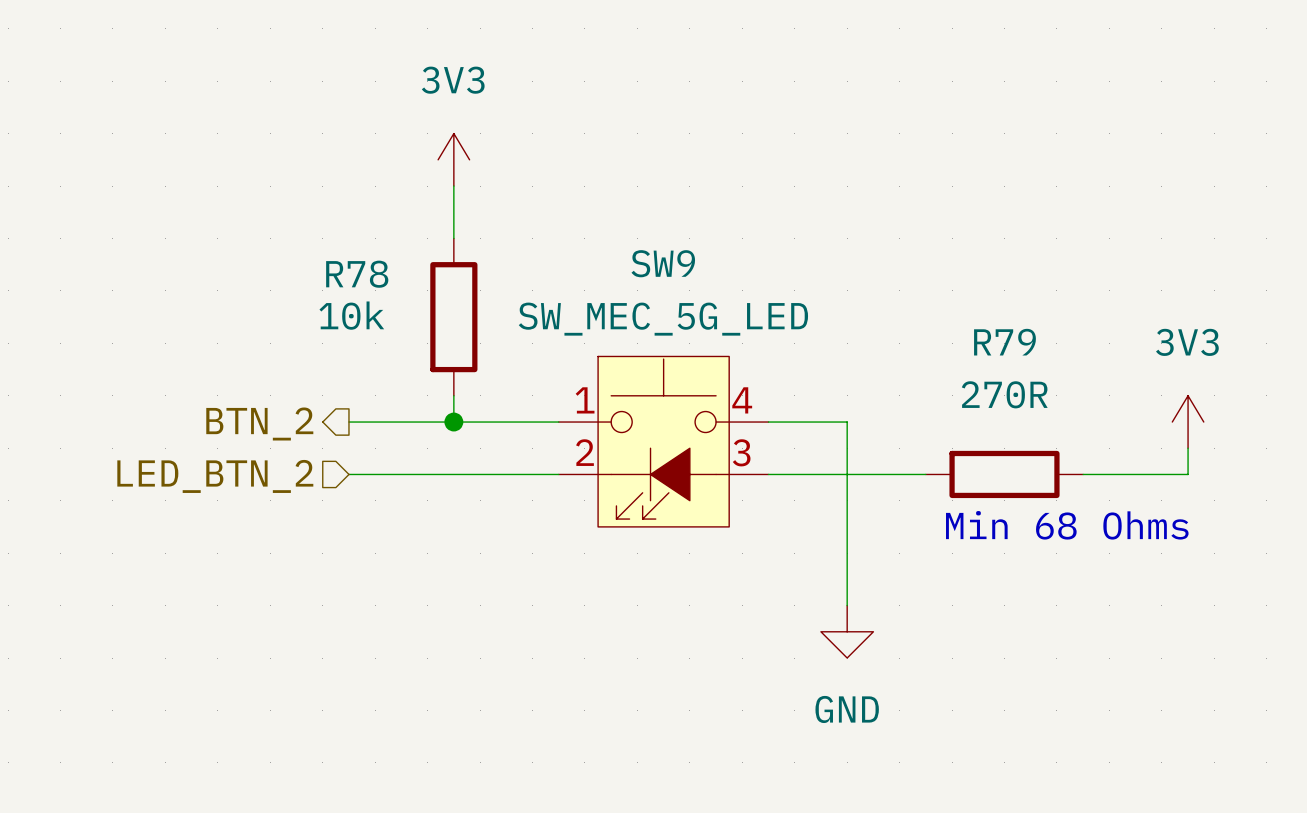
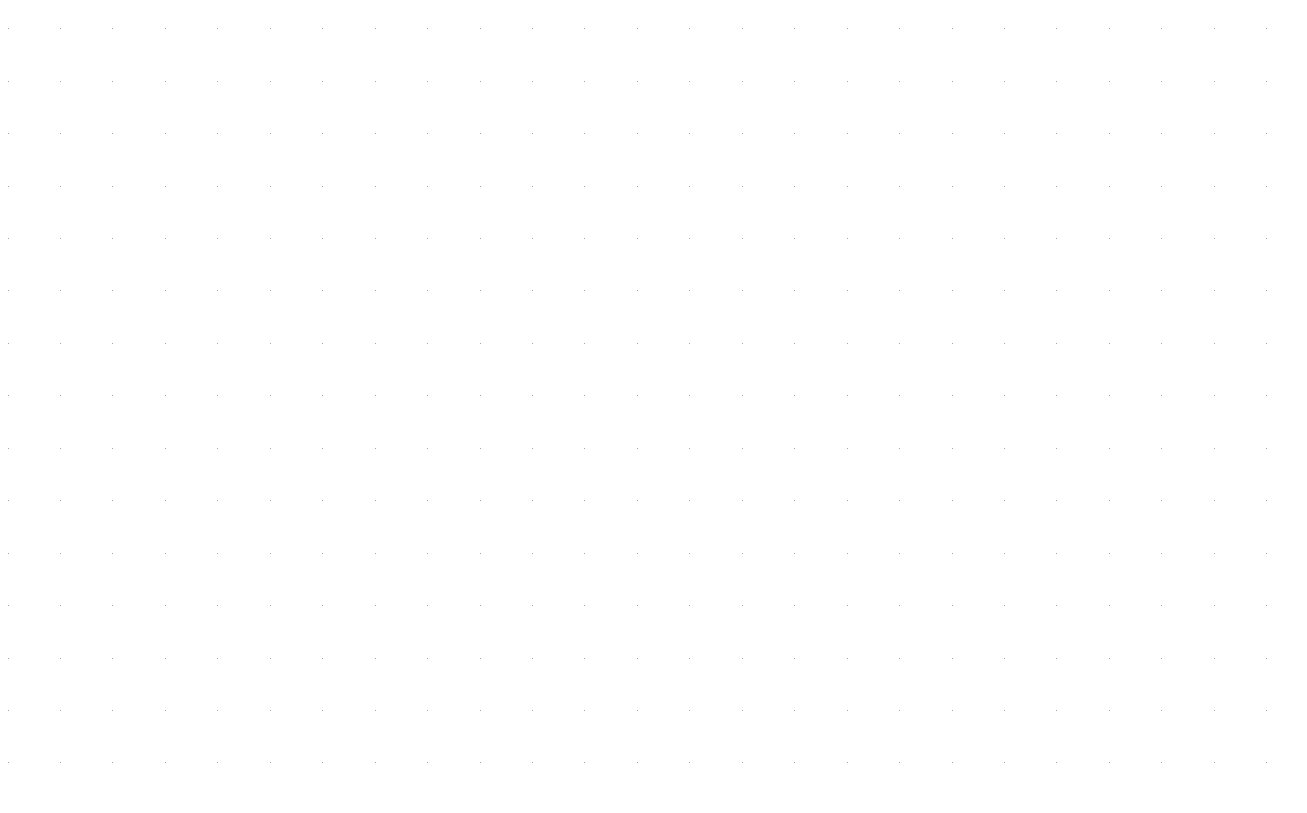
power symbol: 3V3 (453, 159) -> none
wire: (453, 186) (453, 238) -> none
R78: 10k (453, 317) -> none
wire: (453, 395) (453, 422) -> none
wire: (348, 422) (558, 422) -> none
junction: (453, 422) -> none
wire: (768, 422) (847, 422) (847, 605) -> none
power symbol: 3V3 (1188, 422) -> none
hierarchical label: BTN_2 (259, 423) -> none
SW9: SW_MEC_5G_LED (663, 441) -> none
wire: (1188, 448) (1188, 474) (1083, 474) -> none
wire: (348, 474) (558, 474) -> none
wire: (768, 474) (925, 474) -> none
R79: 270R (1004, 474) -> none
hierarchical label: LED_BTN_2 (215, 476) -> none
text: Min 68 Ohms (1067, 525) -> none
power symbol: GND (847, 631) -> none

